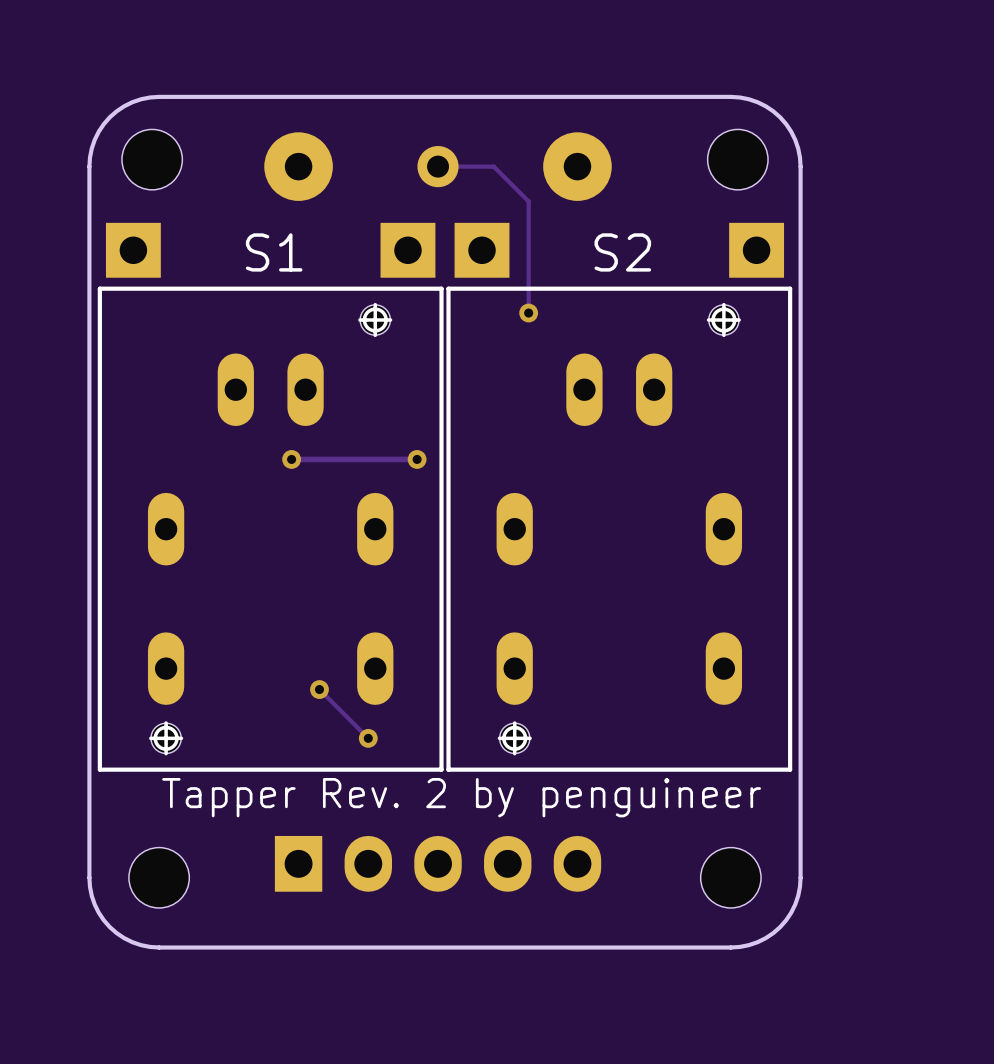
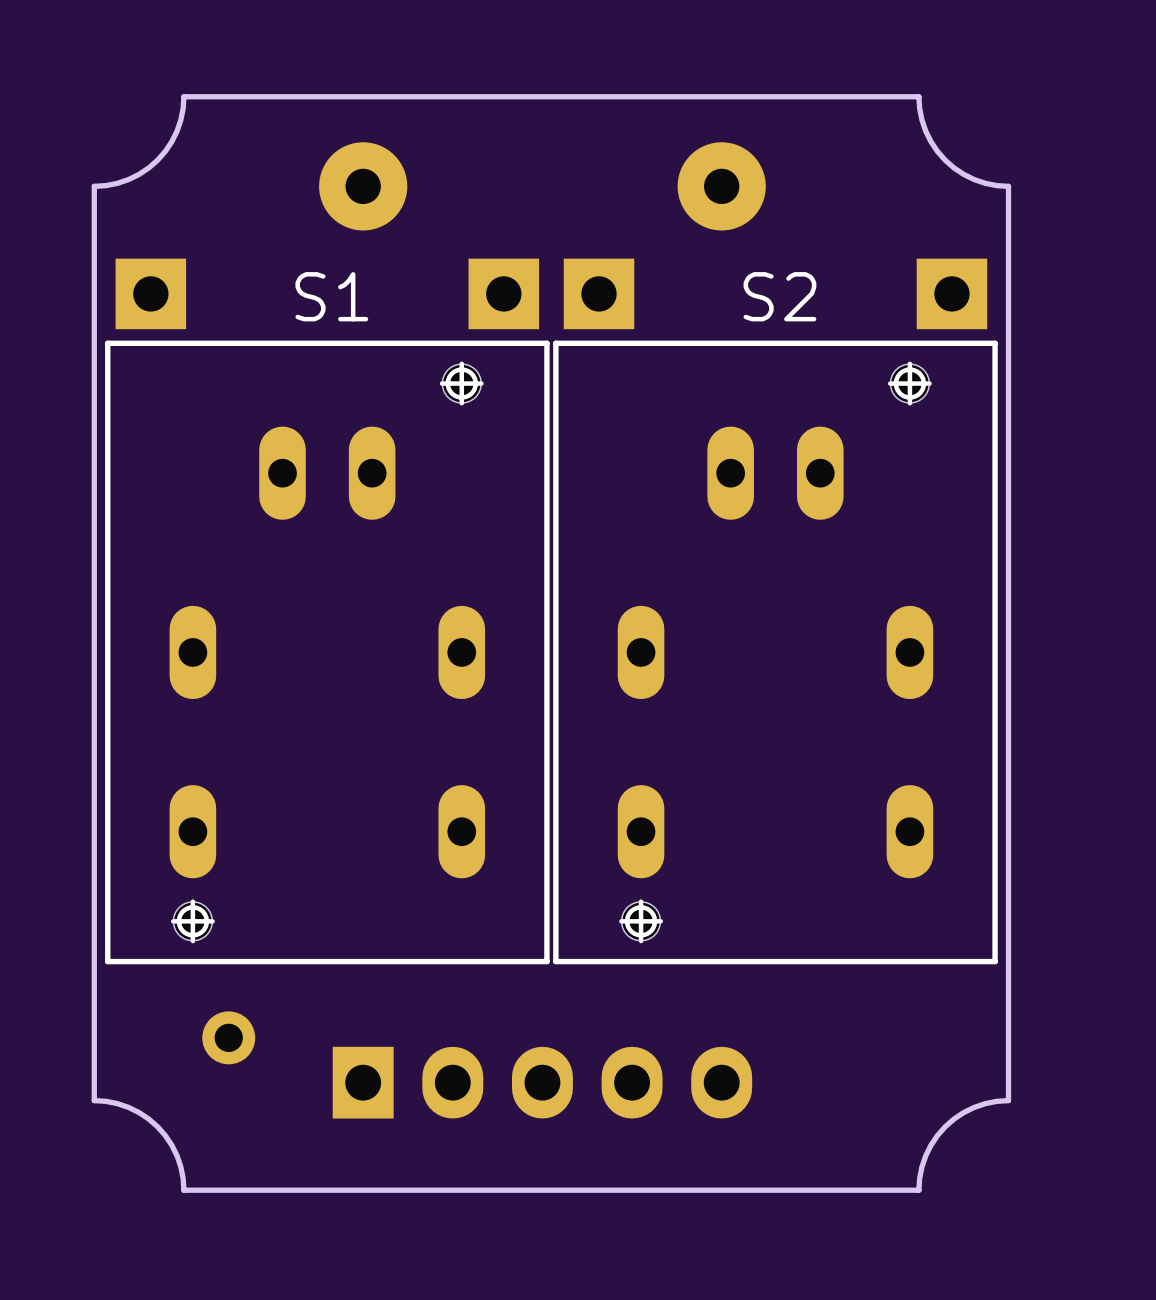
board edge: (159, 96) (132, 102) (109, 117) (94, 139) (89, 166) -> (183, 96) (183, 108) (177, 131) (171, 141) (157, 160) (139, 174) (128, 179) (105, 185) (94, 186)
board edge: (730, 96) (757, 102) (780, 117) (795, 139) (800, 166) -> (918, 96) (919, 108) (925, 131) (930, 141) (945, 160) (953, 167) (974, 179) (996, 185) (1008, 186)
part: (152, 159) -> none
part: (737, 159) -> none
track: (438, 166) (493, 166) (528, 201) (528, 313) -> none
part: (438, 166) -> none
via: (528, 313) -> none
via: (291, 459) -> none
track: (417, 459) (291, 459) -> none
via: (417, 459) -> none
track: (319, 689) (368, 738) -> none
via: (319, 689) -> none
via: (368, 738) -> none
text: Tapper Rev. 2 by penguineer (461, 797) -> none
part: none -> (228, 1037)
board edge: (89, 877) (94, 904) (109, 927) (132, 942) (159, 947) -> (94, 1100) (117, 1103) (128, 1107) (139, 1112) (157, 1126) (171, 1145) (177, 1155) (183, 1178) (183, 1190)
part: (159, 877) -> none
part: (730, 877) -> none
board edge: (800, 877) (795, 904) (780, 927) (757, 942) (730, 947) -> (1008, 1100) (985, 1103) (974, 1107) (953, 1119) (945, 1126) (930, 1145) (925, 1155) (919, 1178) (918, 1190)

